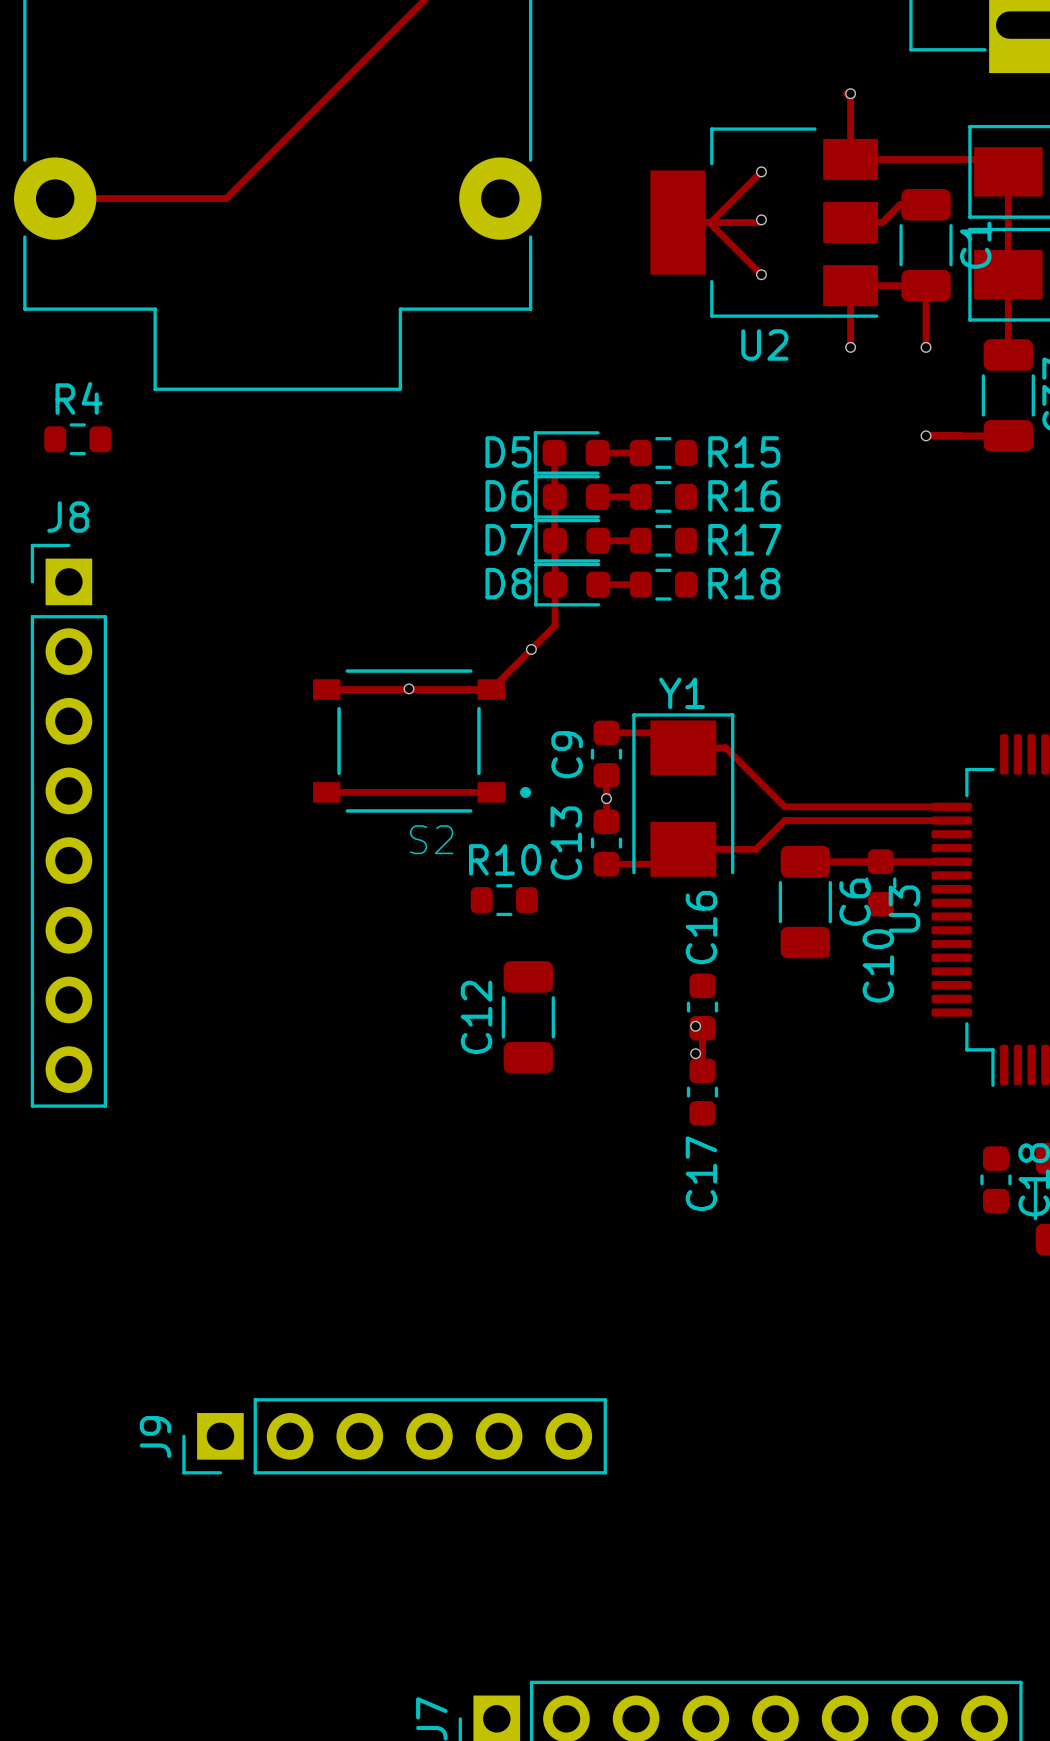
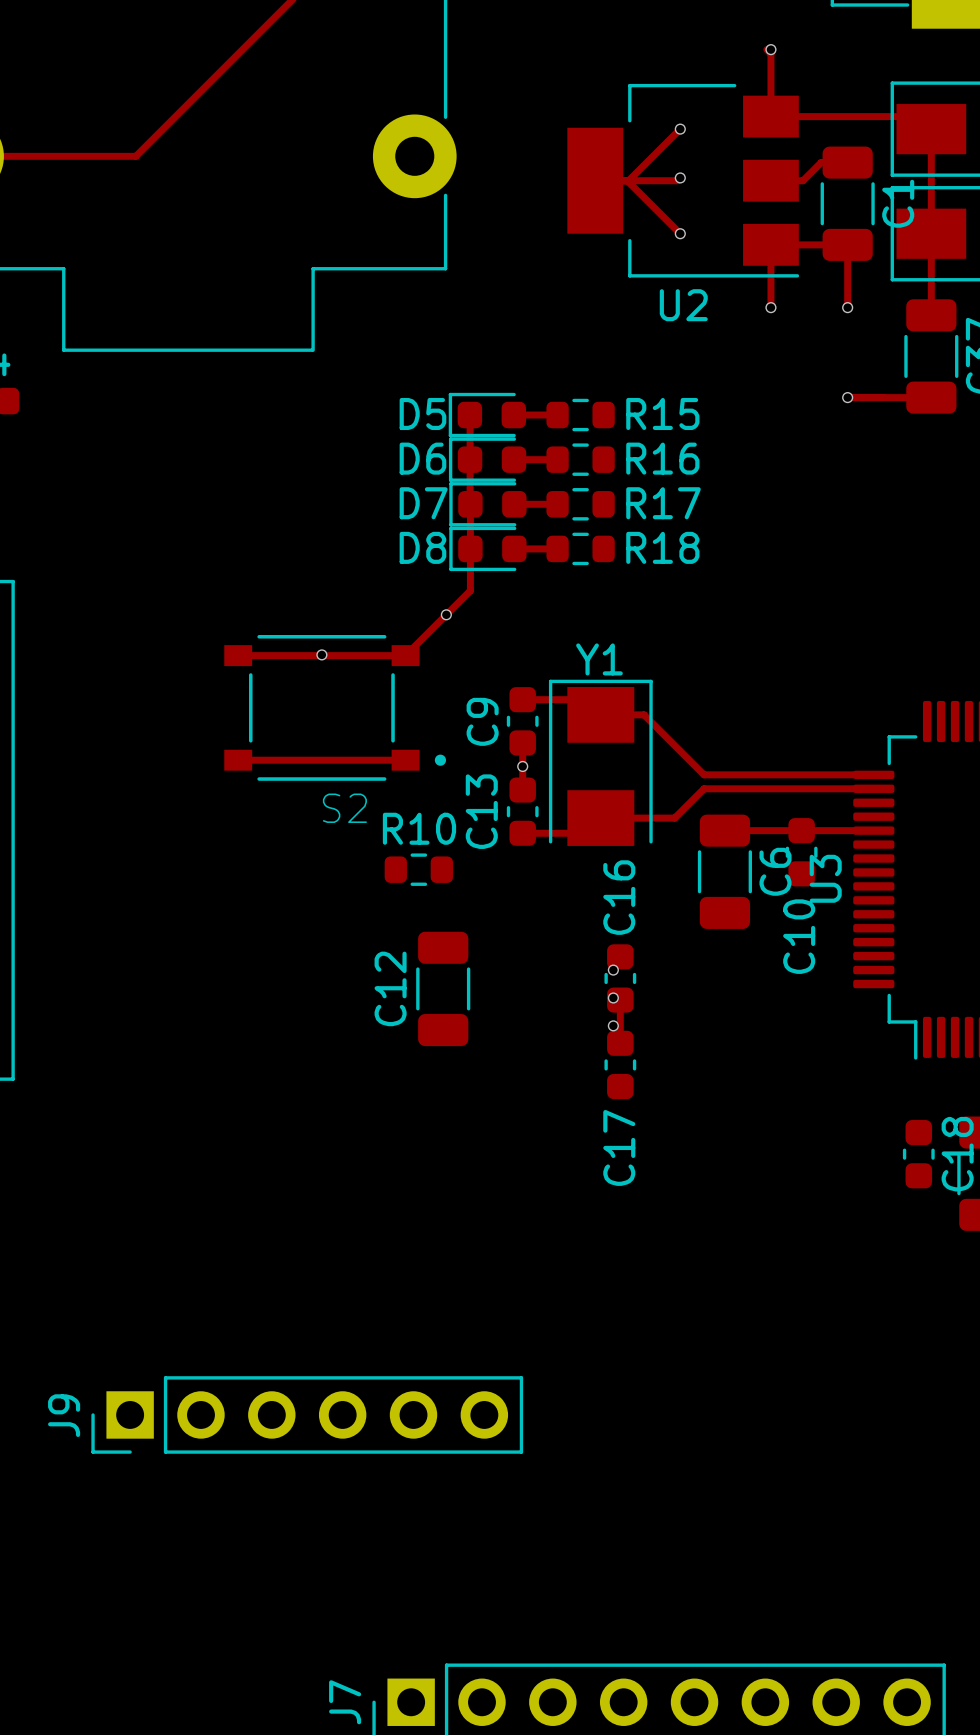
via: none -> (613, 970)

